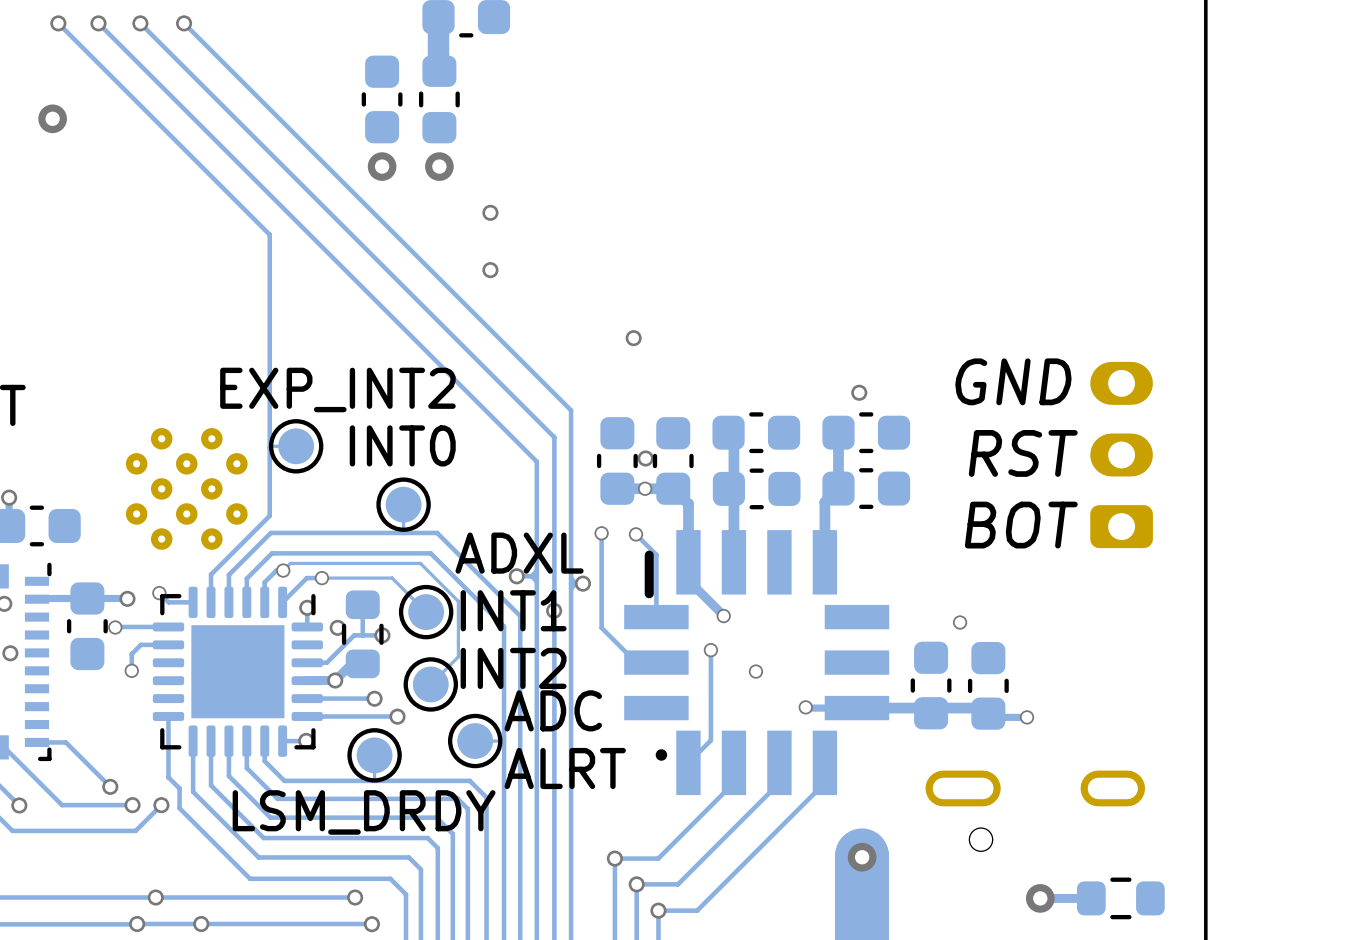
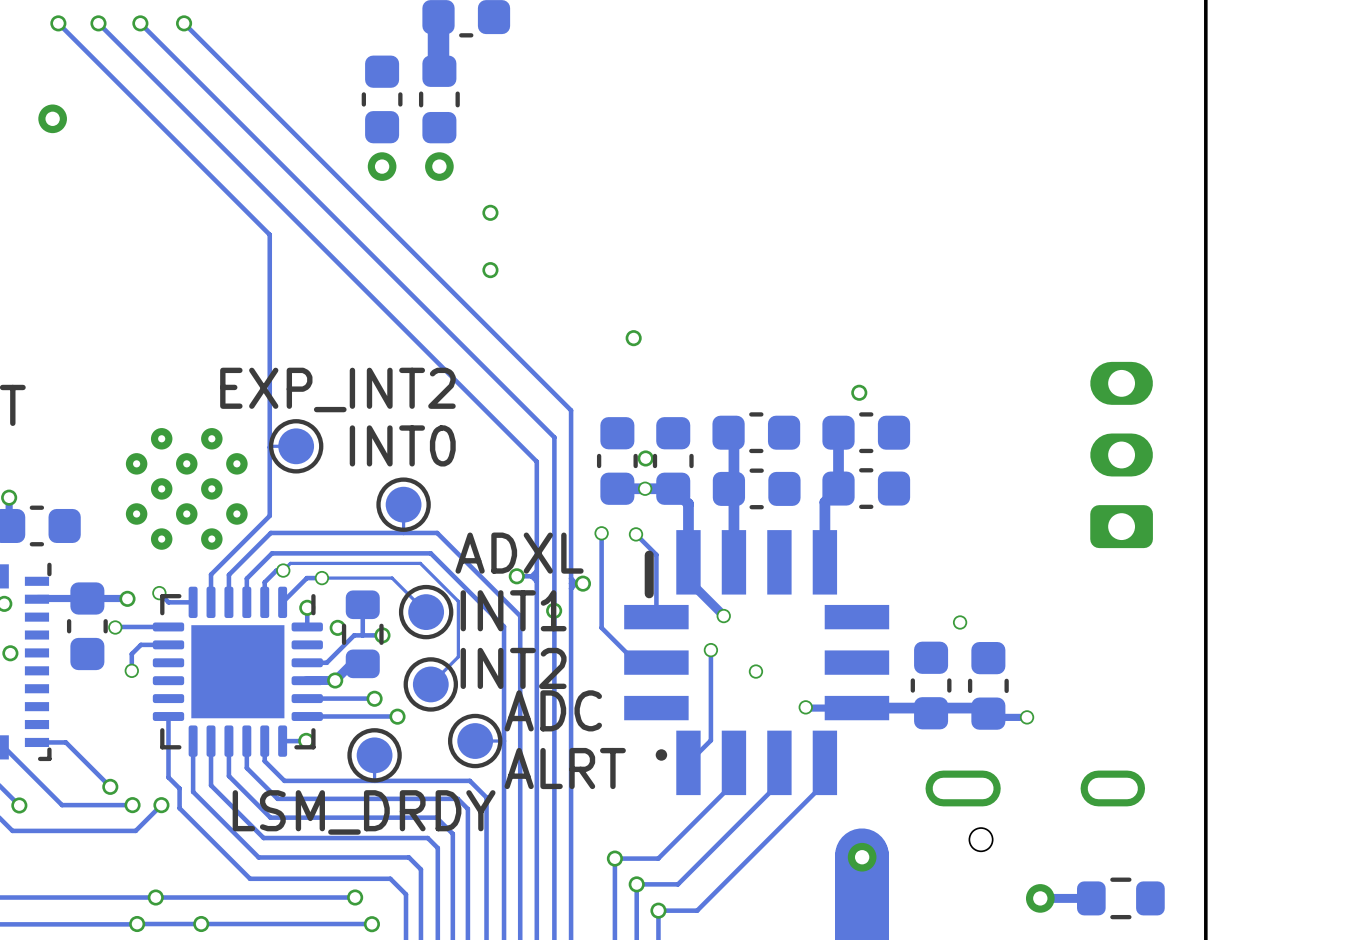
text: GND (1013, 381) -> none
text: RST (1023, 453) -> none
text: BOT (1021, 525) -> none

